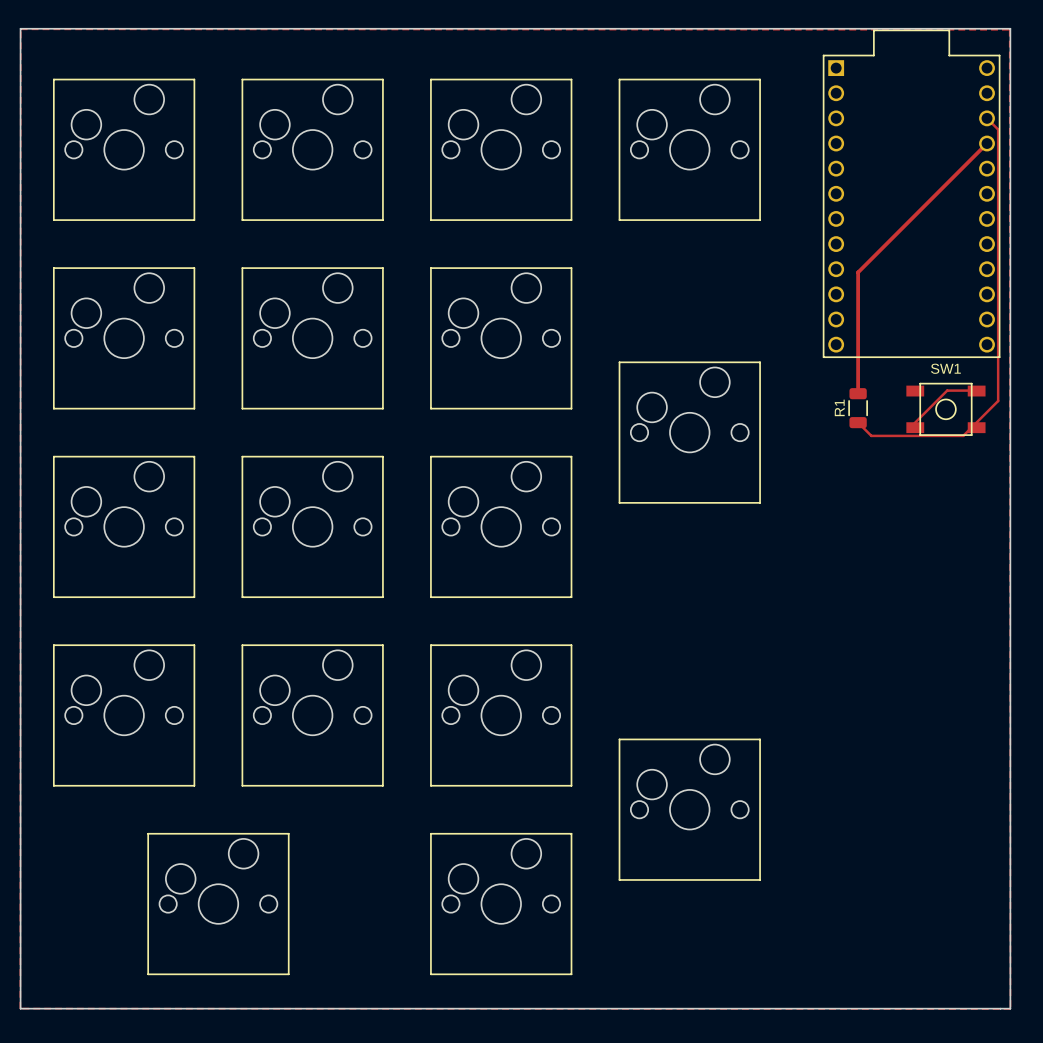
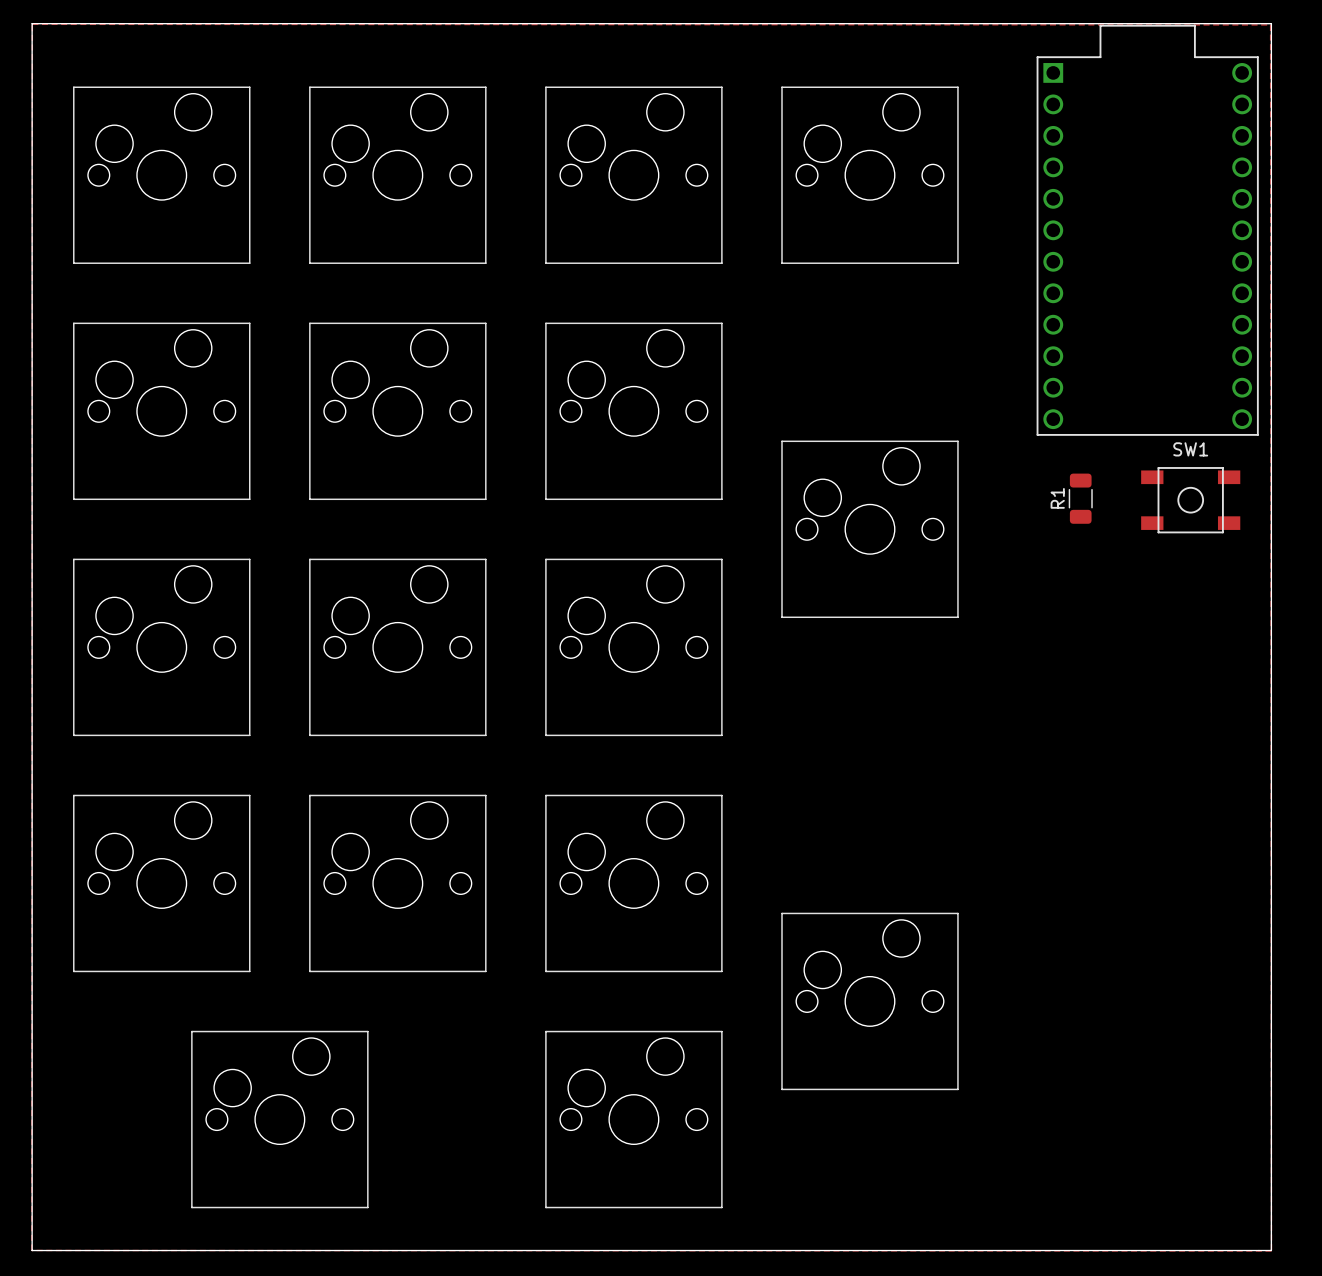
track: (987, 118) (998, 129) (998, 401) (963, 435) (871, 435) (858, 422) -> none
track: (987, 143) (858, 272) (858, 393) -> none
track: (971, 390) (947, 390) (910, 427) -> none

